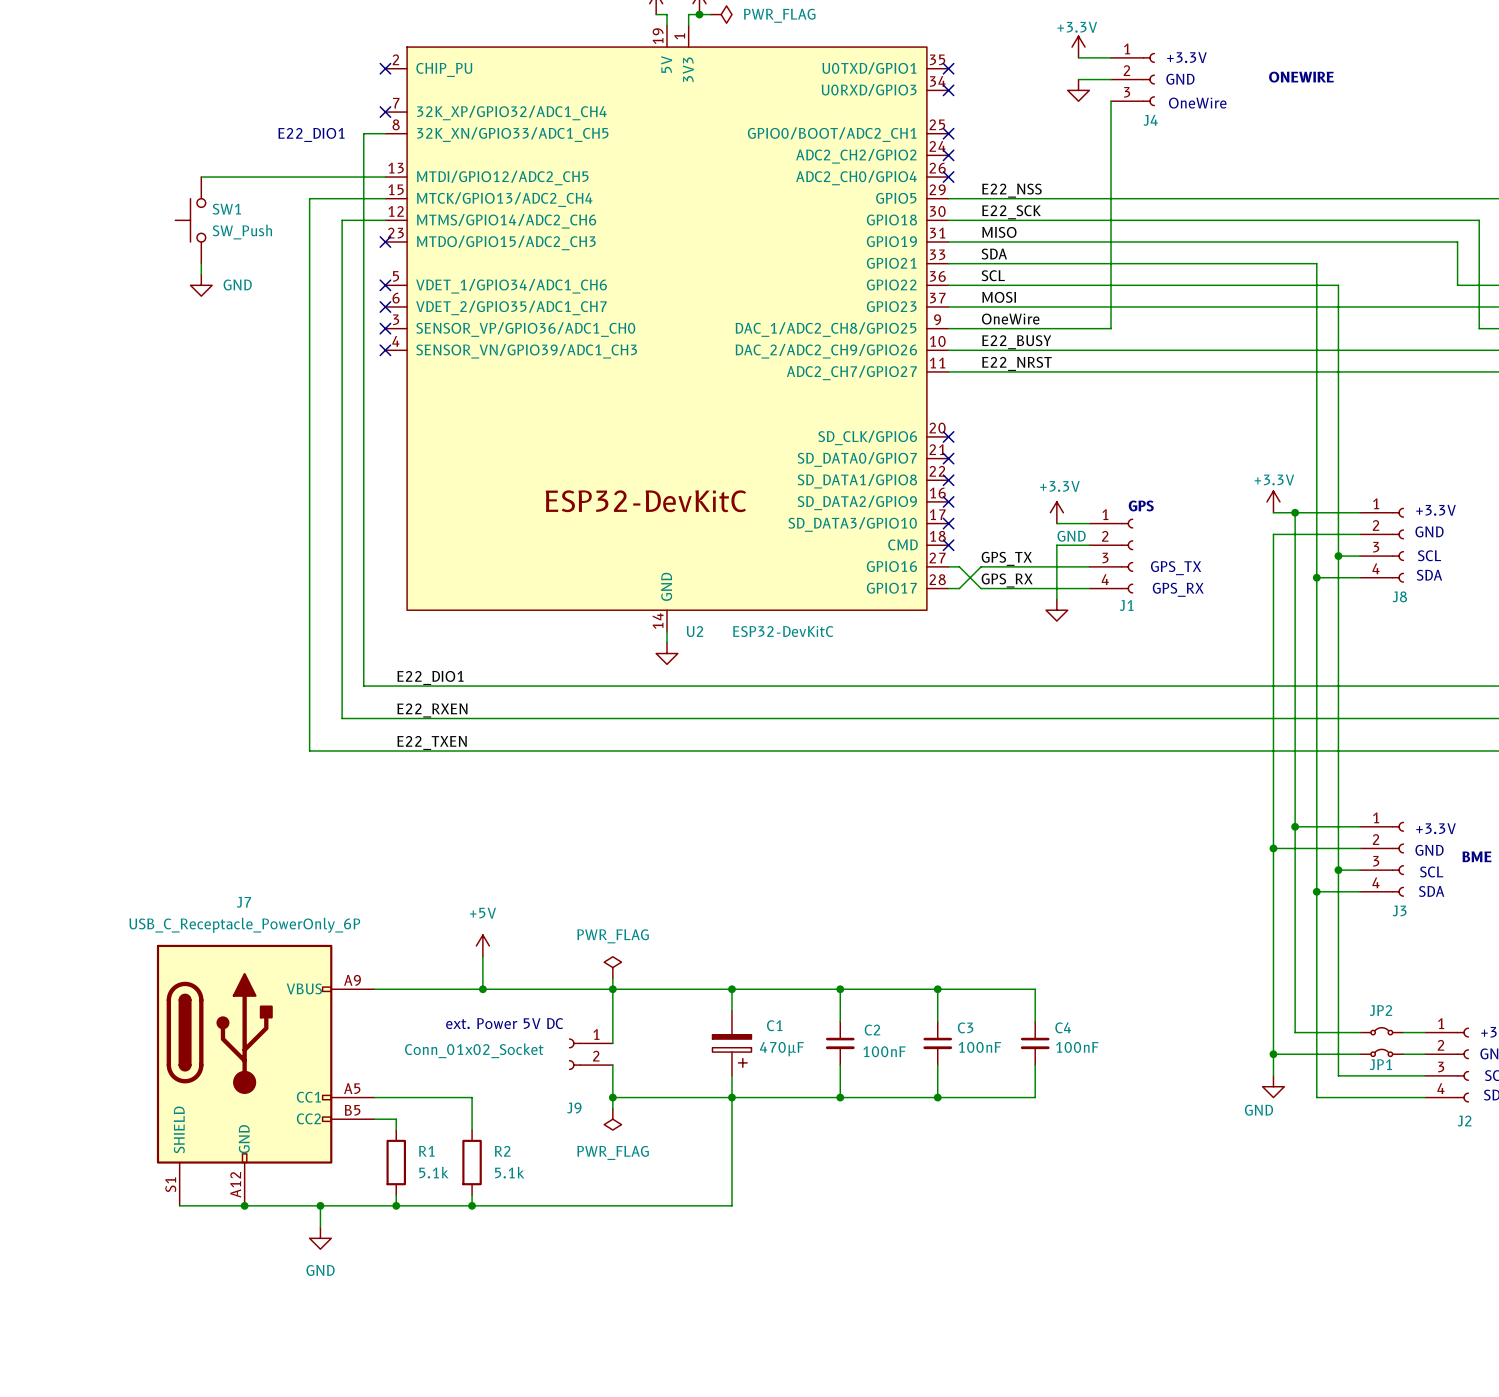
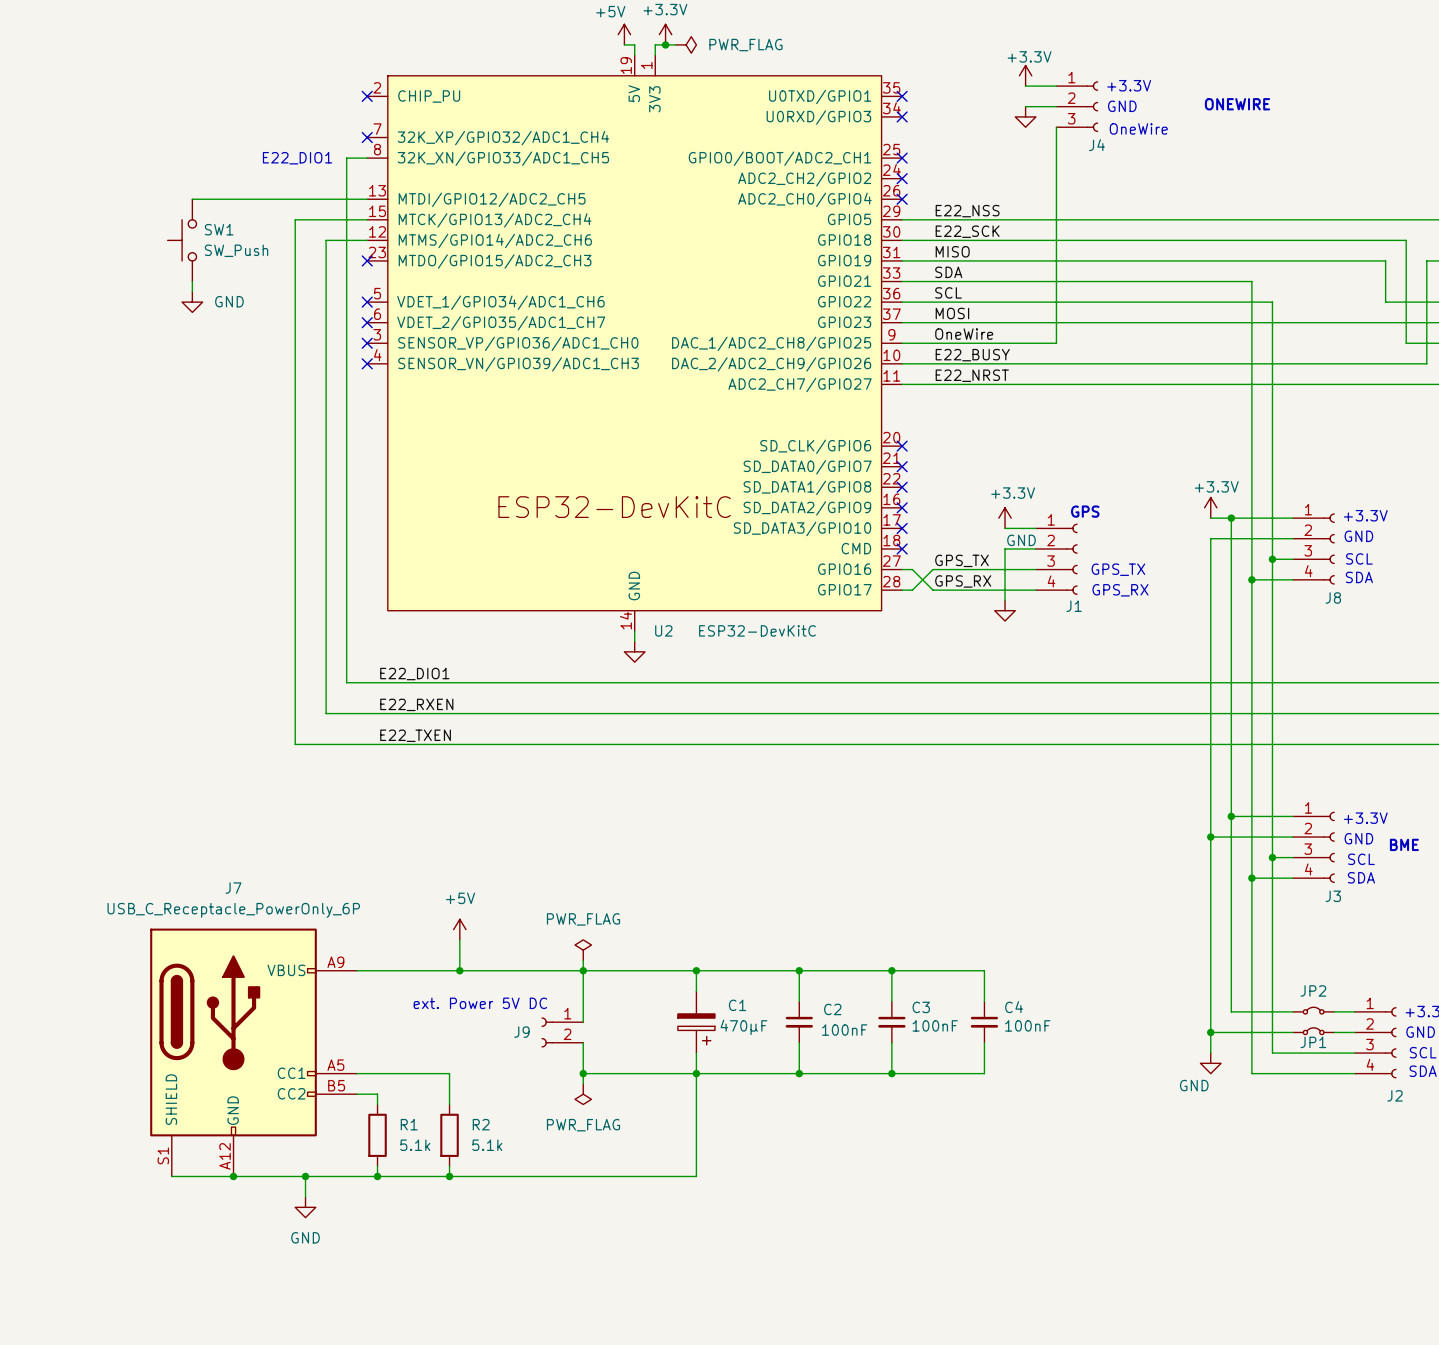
J9 value: Conn_01x02_Socket (474, 1050) -> none
J9 name position: J9 (574, 1108) -> J9 (521, 1032)

